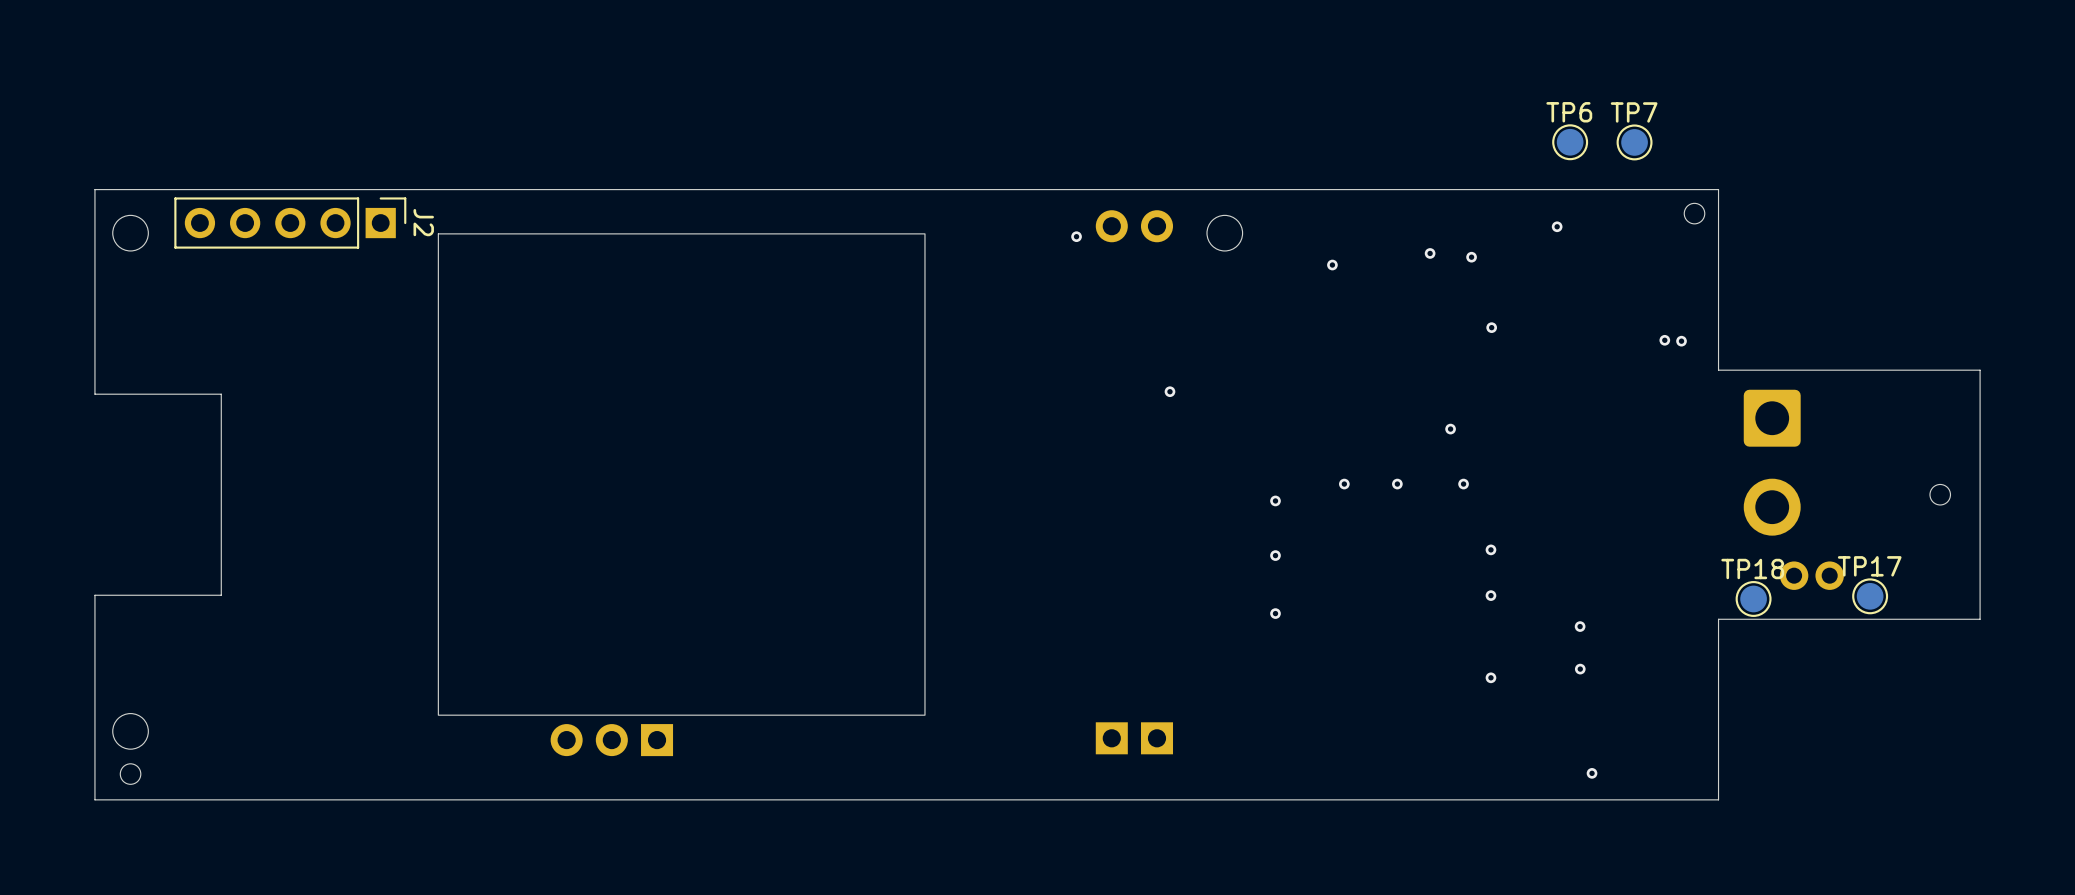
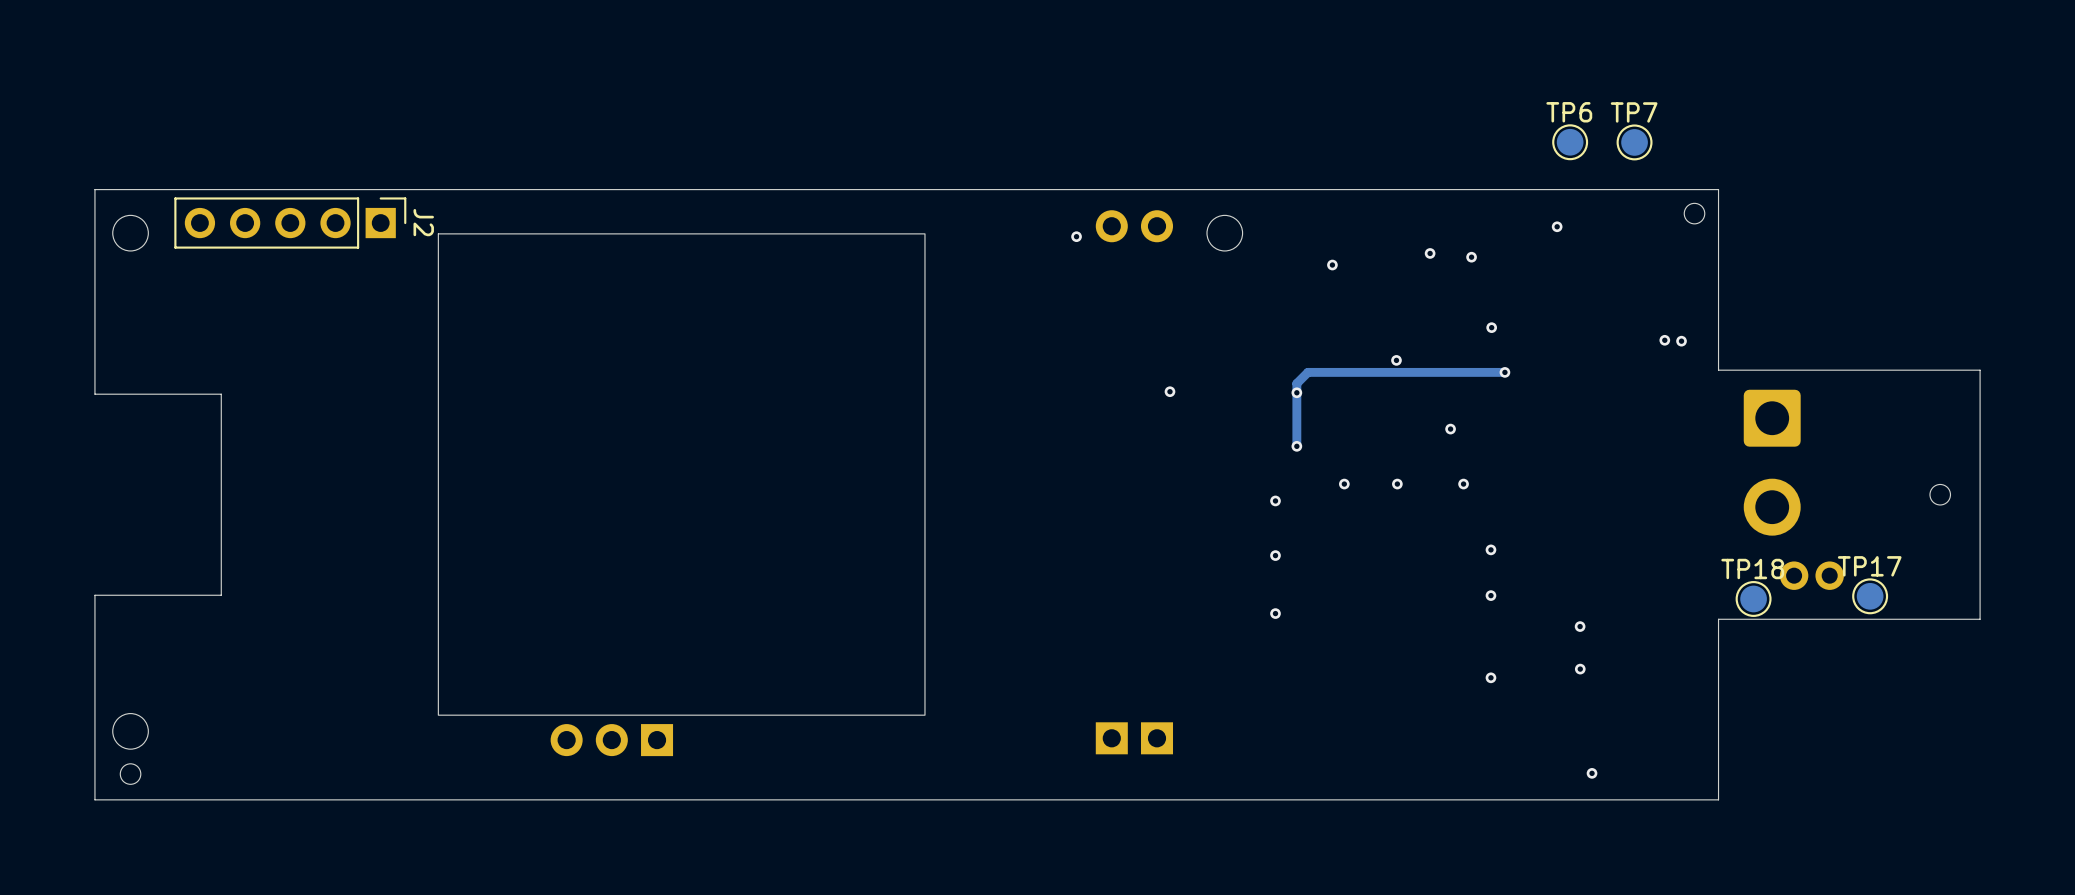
via: none -> (1396, 360)
track: none -> (1504, 372) (1307, 372) (1296, 383) (1296, 446)
via: none -> (1504, 372)
via: none -> (1296, 392)
via: none -> (1296, 446)

